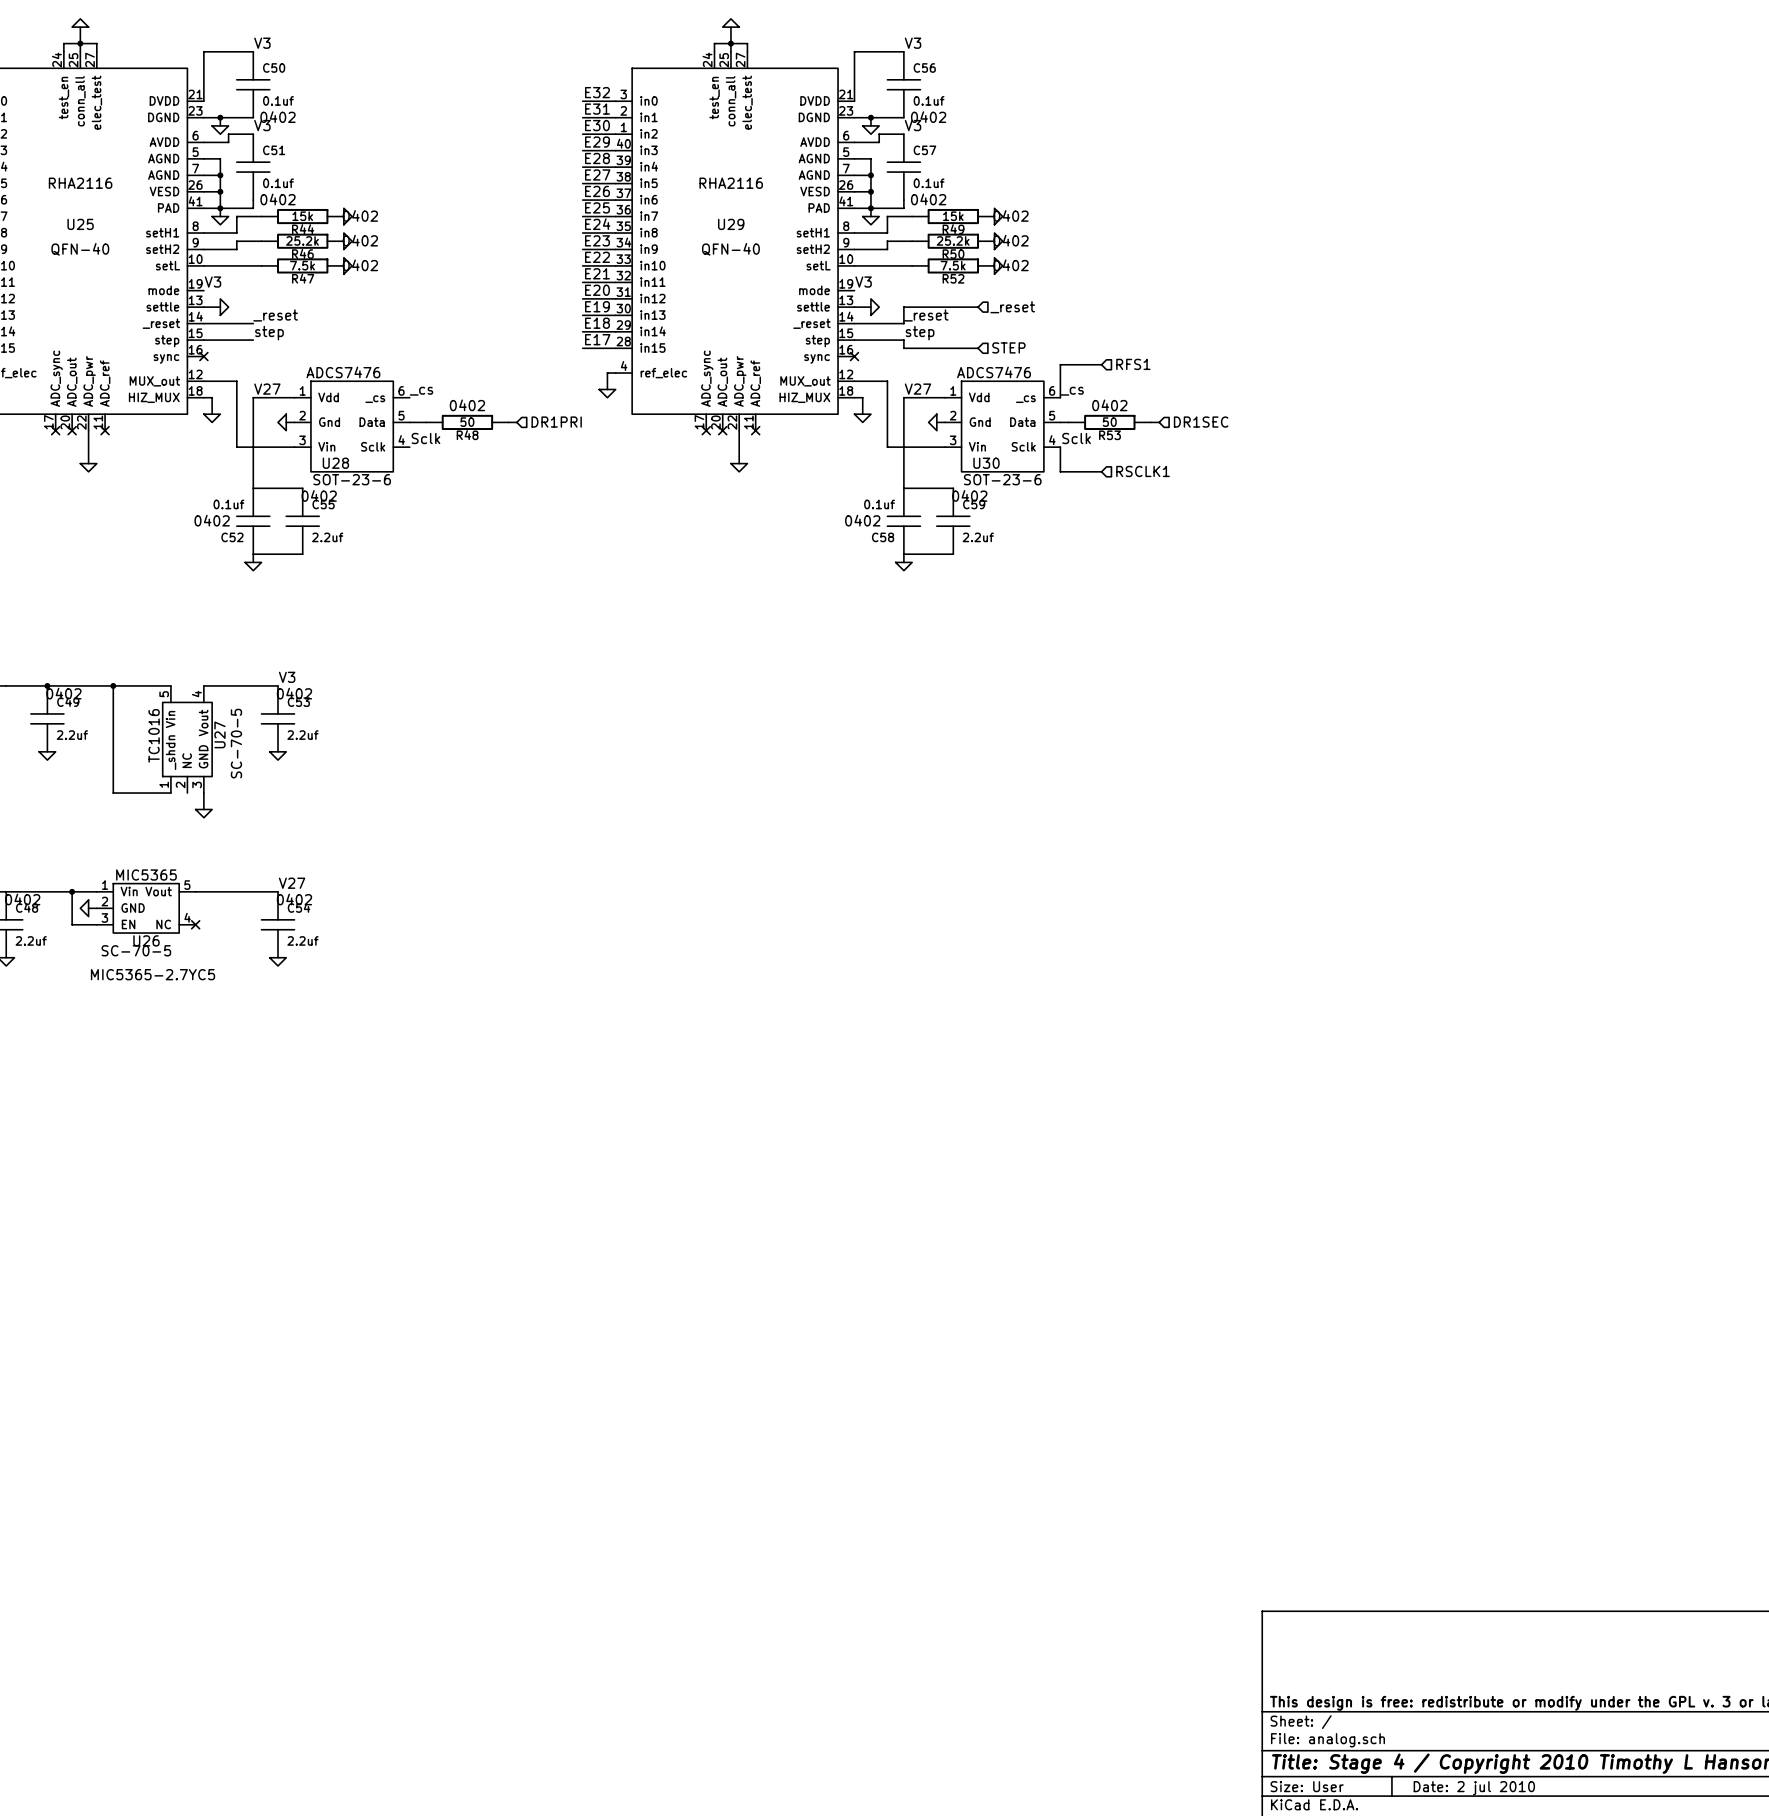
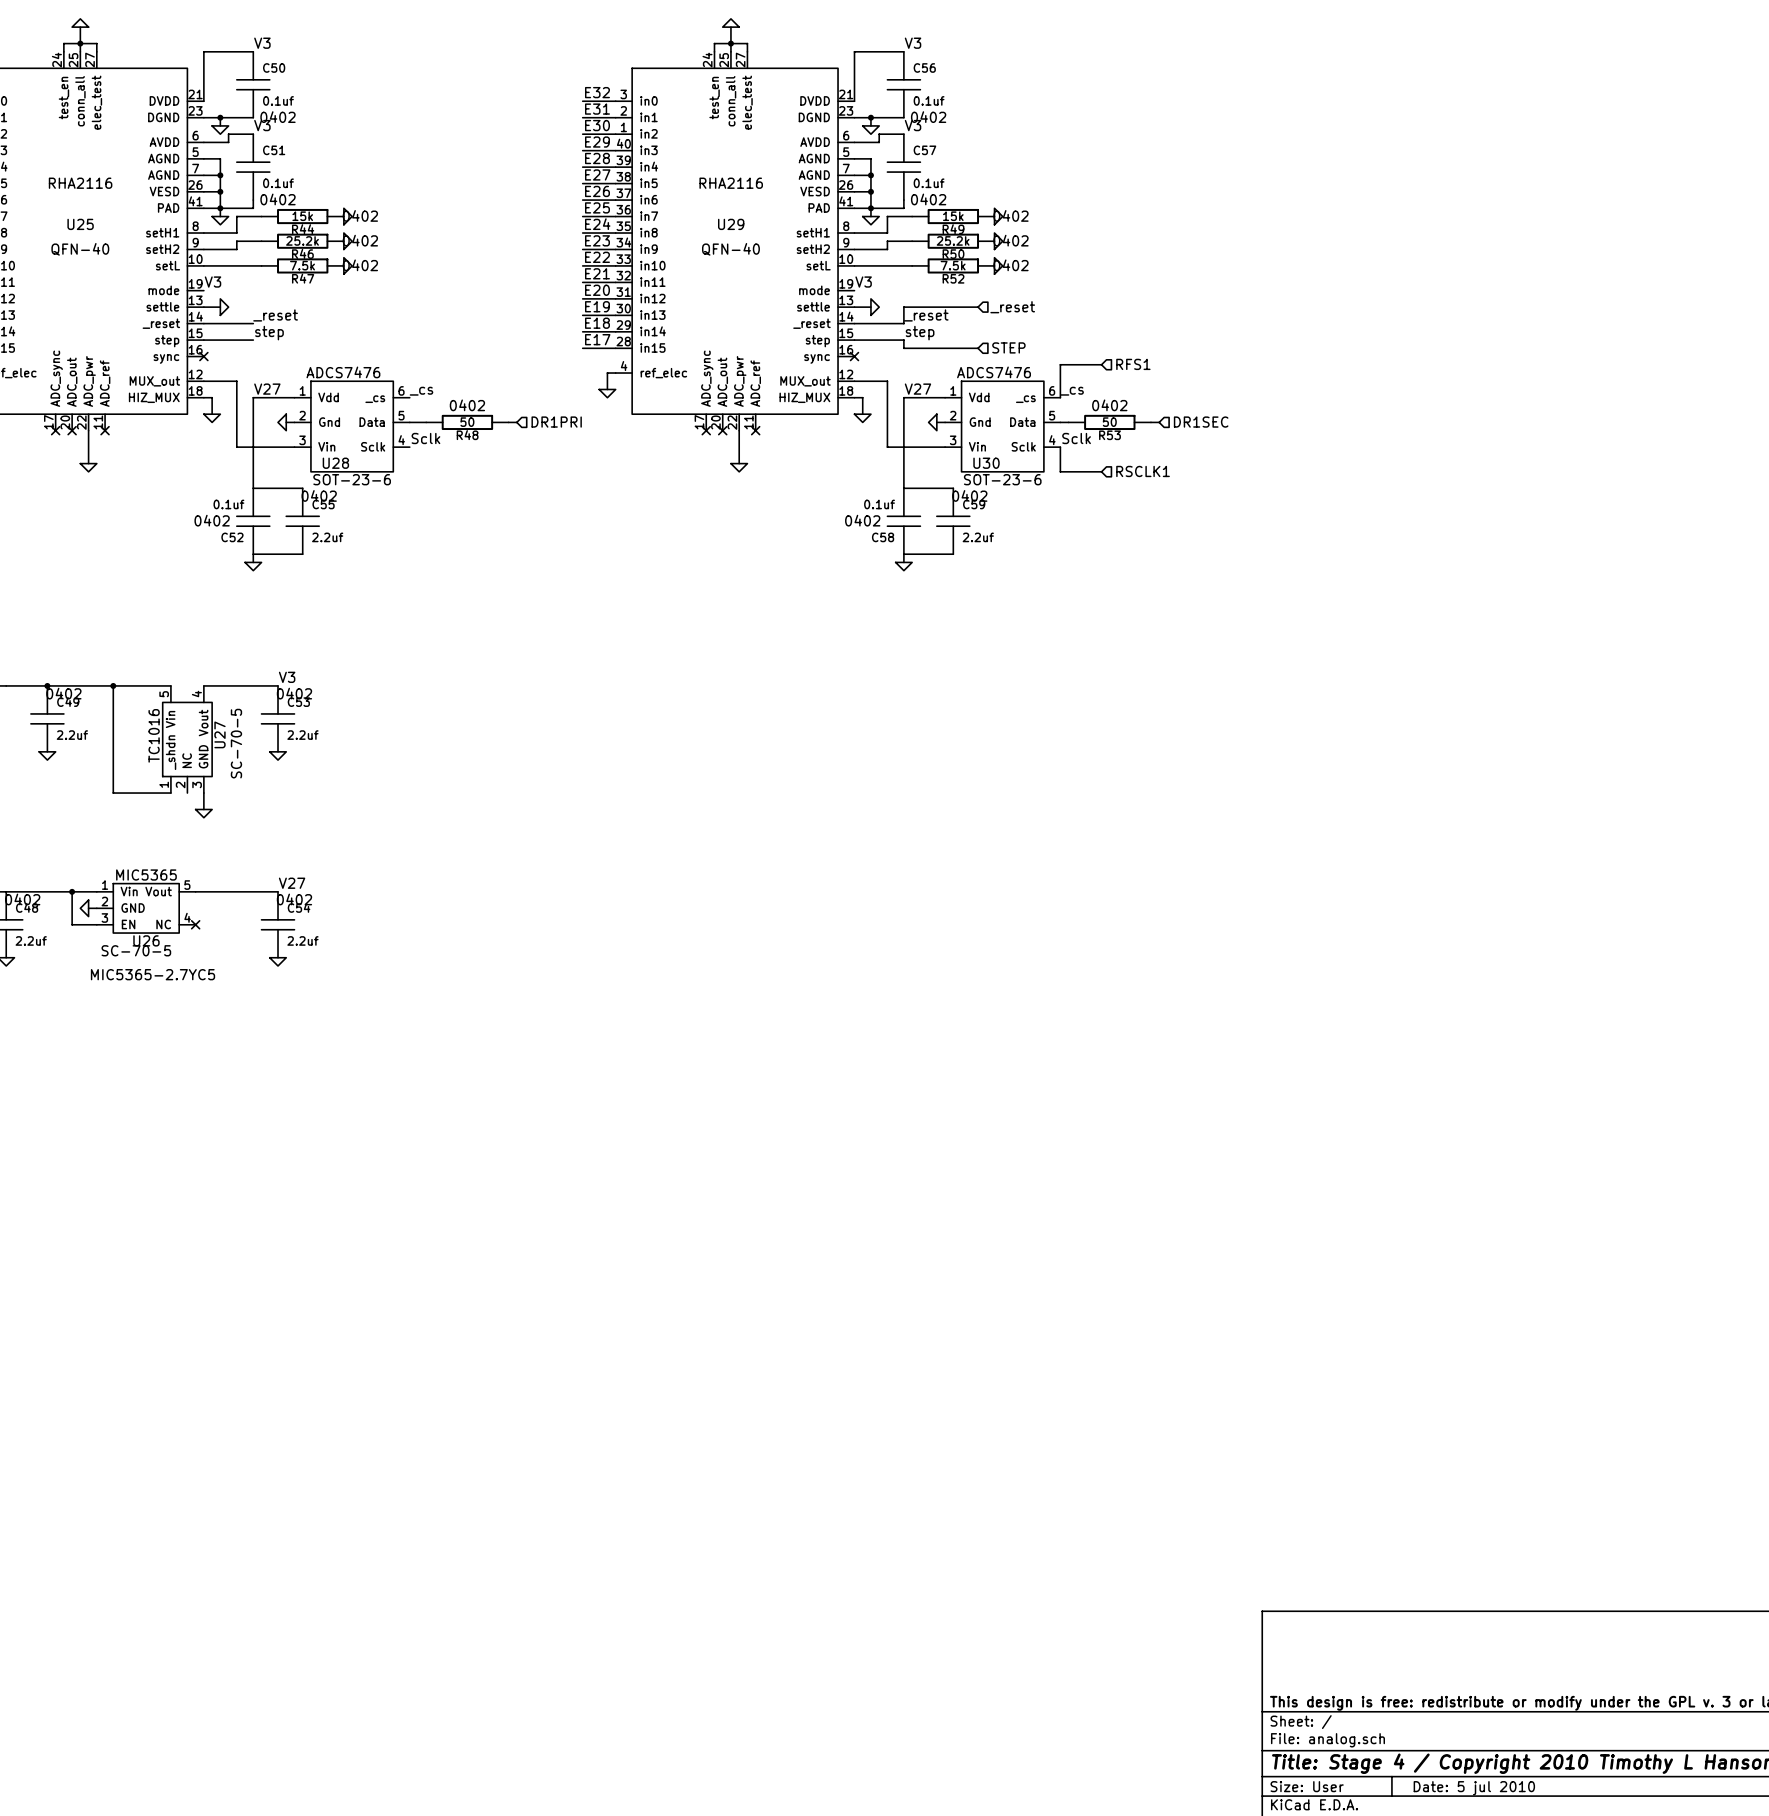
title block: Date: 2 jul 2010 (1474, 1788) -> Date: 5 jul 2010 (1474, 1788)

